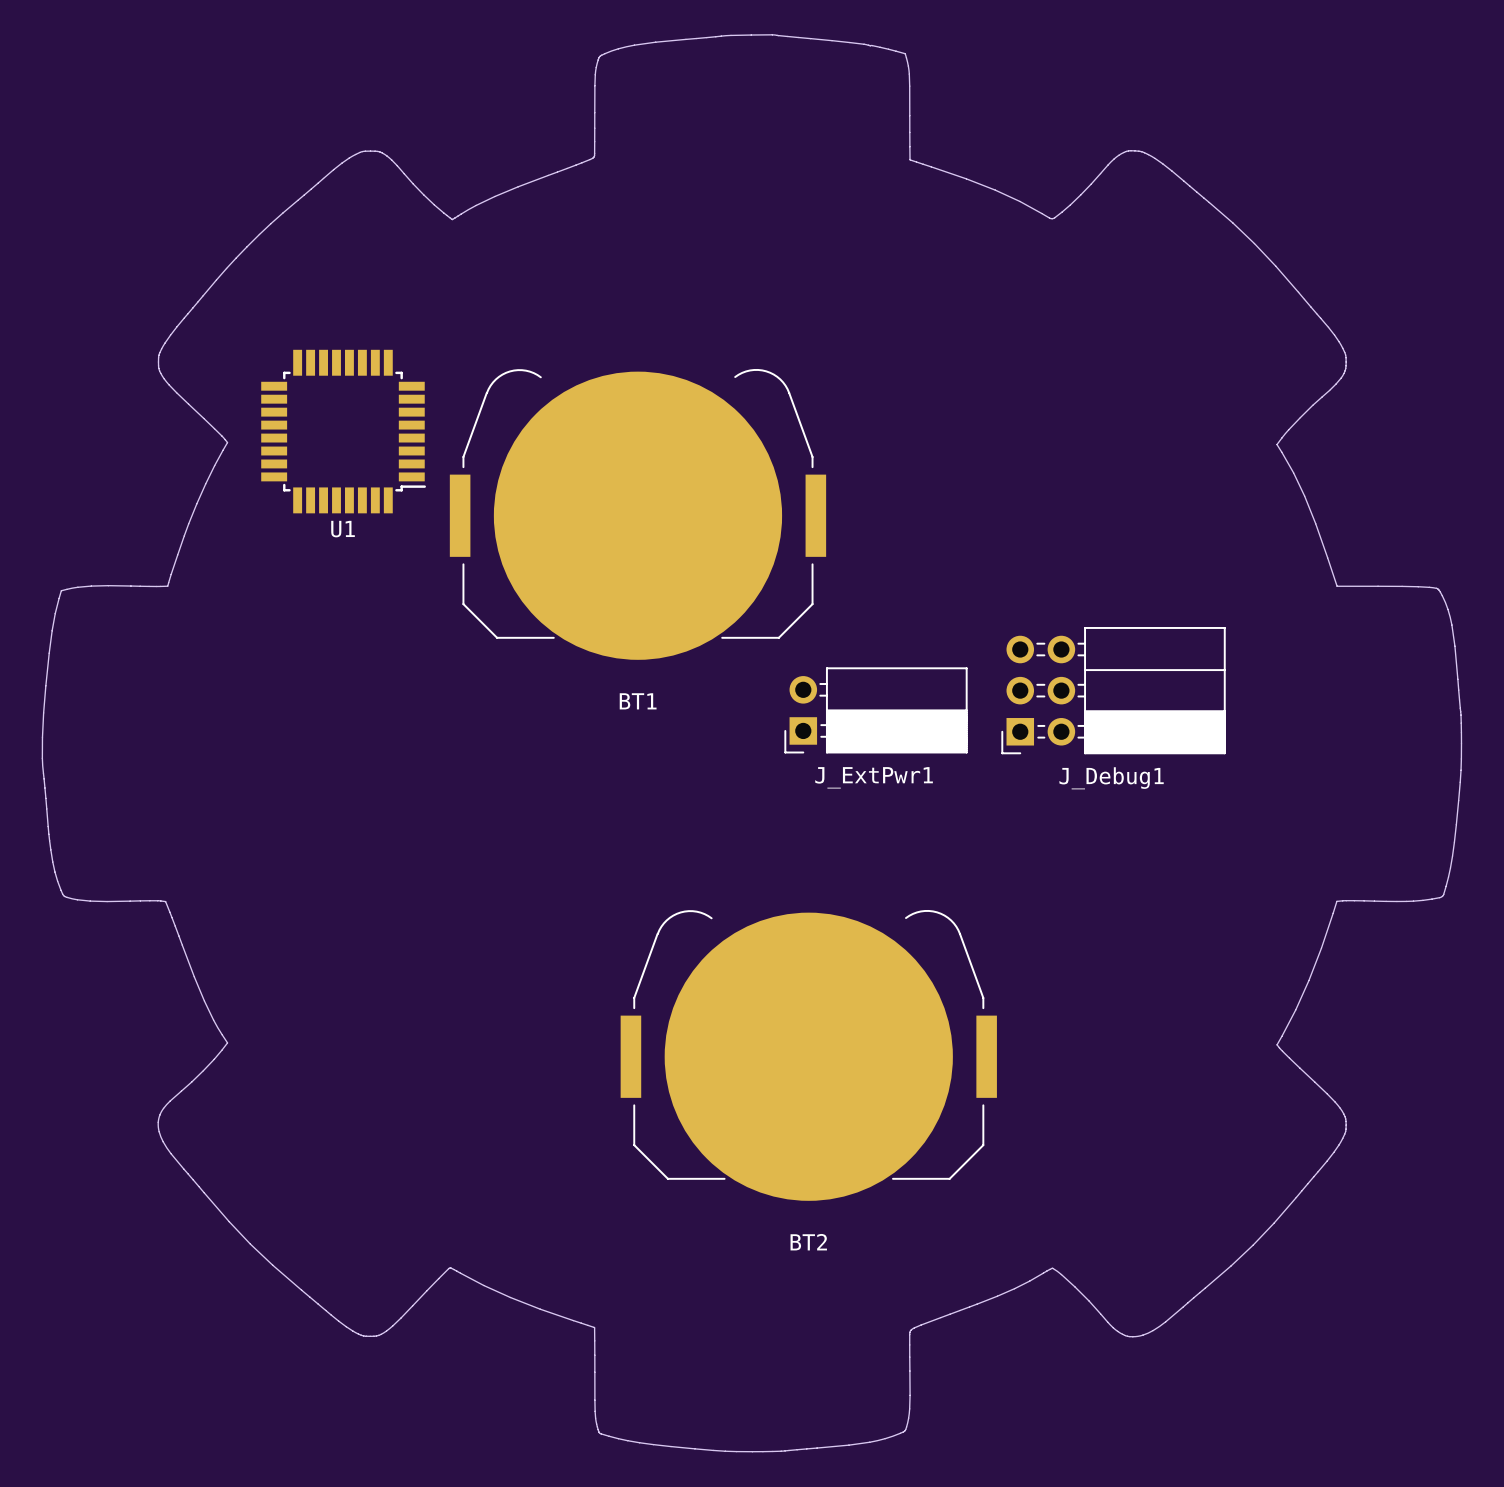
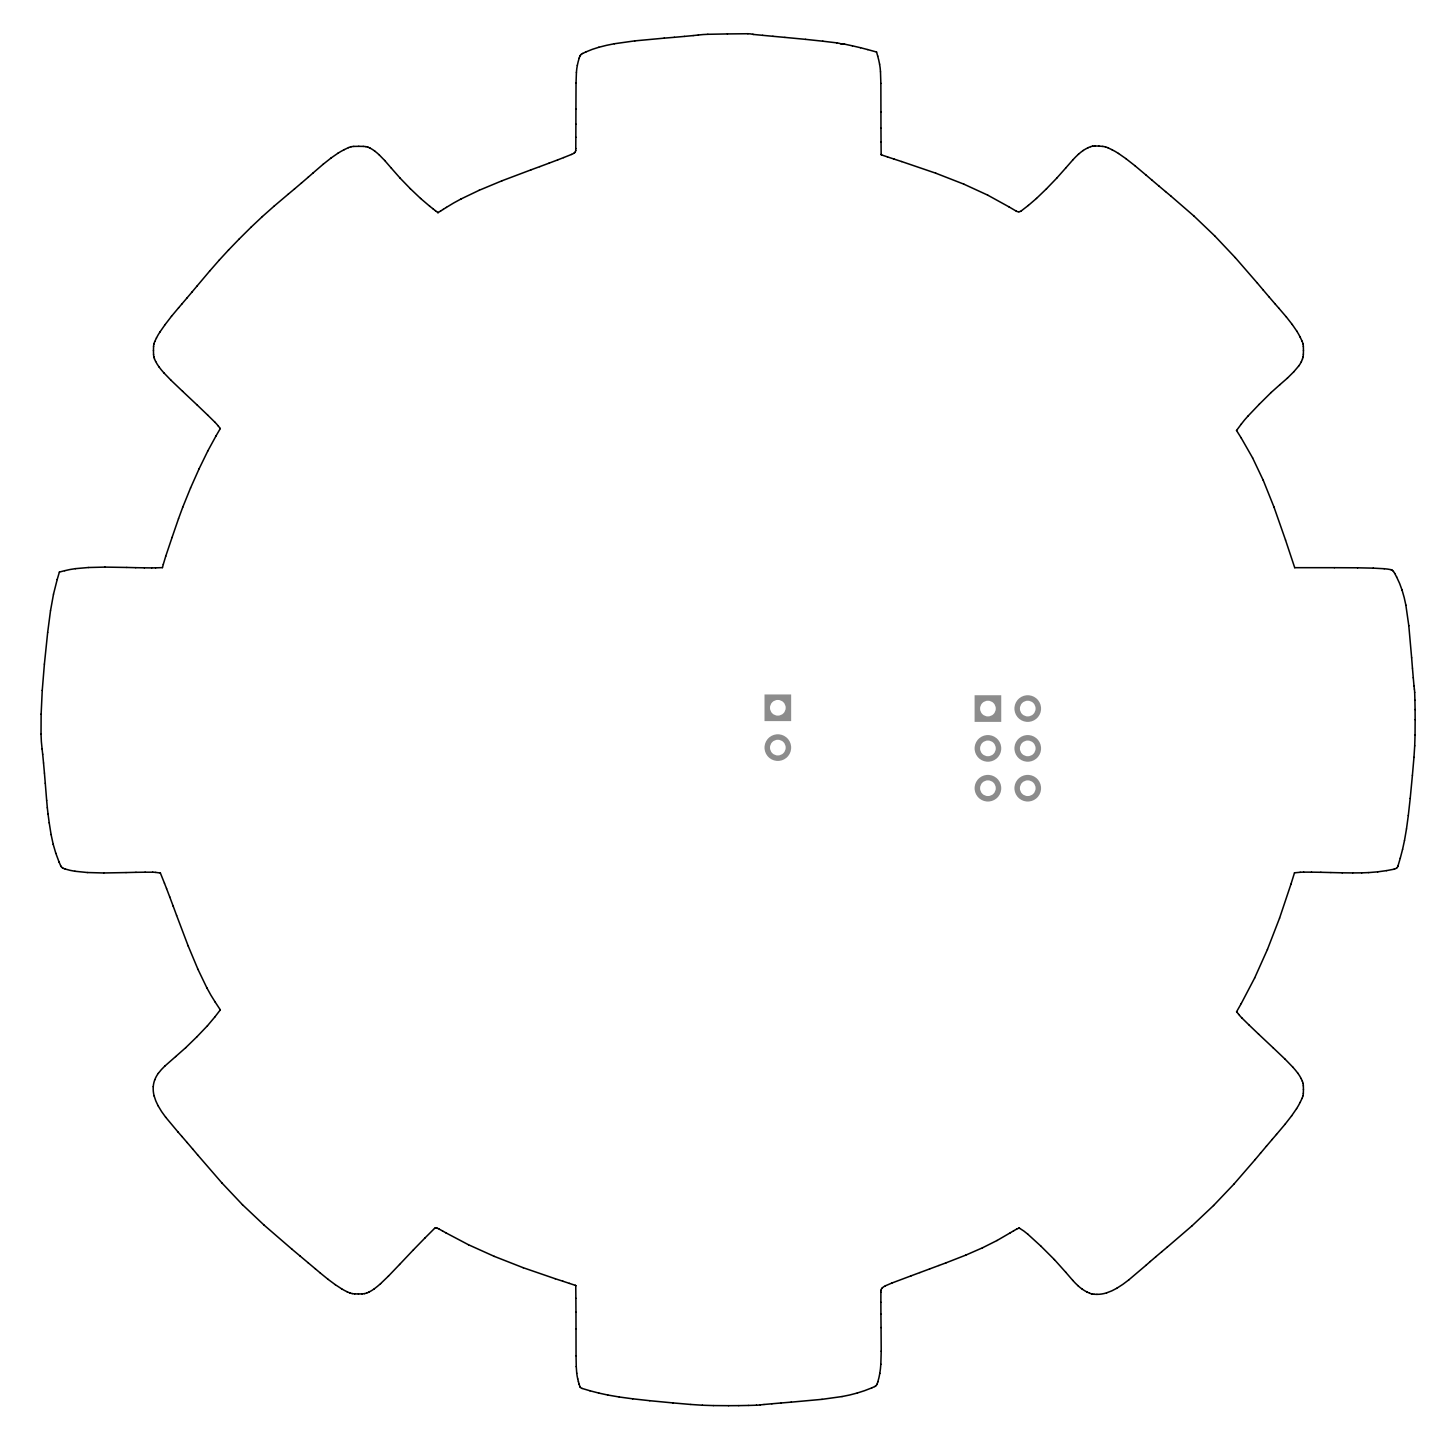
U1: (343, 431) -> none
BT1: (637, 514) -> none
J_Debug1 side: bottom (1113, 690) -> top (1007, 748)
J_ExtPwr1 side: bottom (876, 710) -> top (777, 727)
BT2: (808, 1055) -> none

